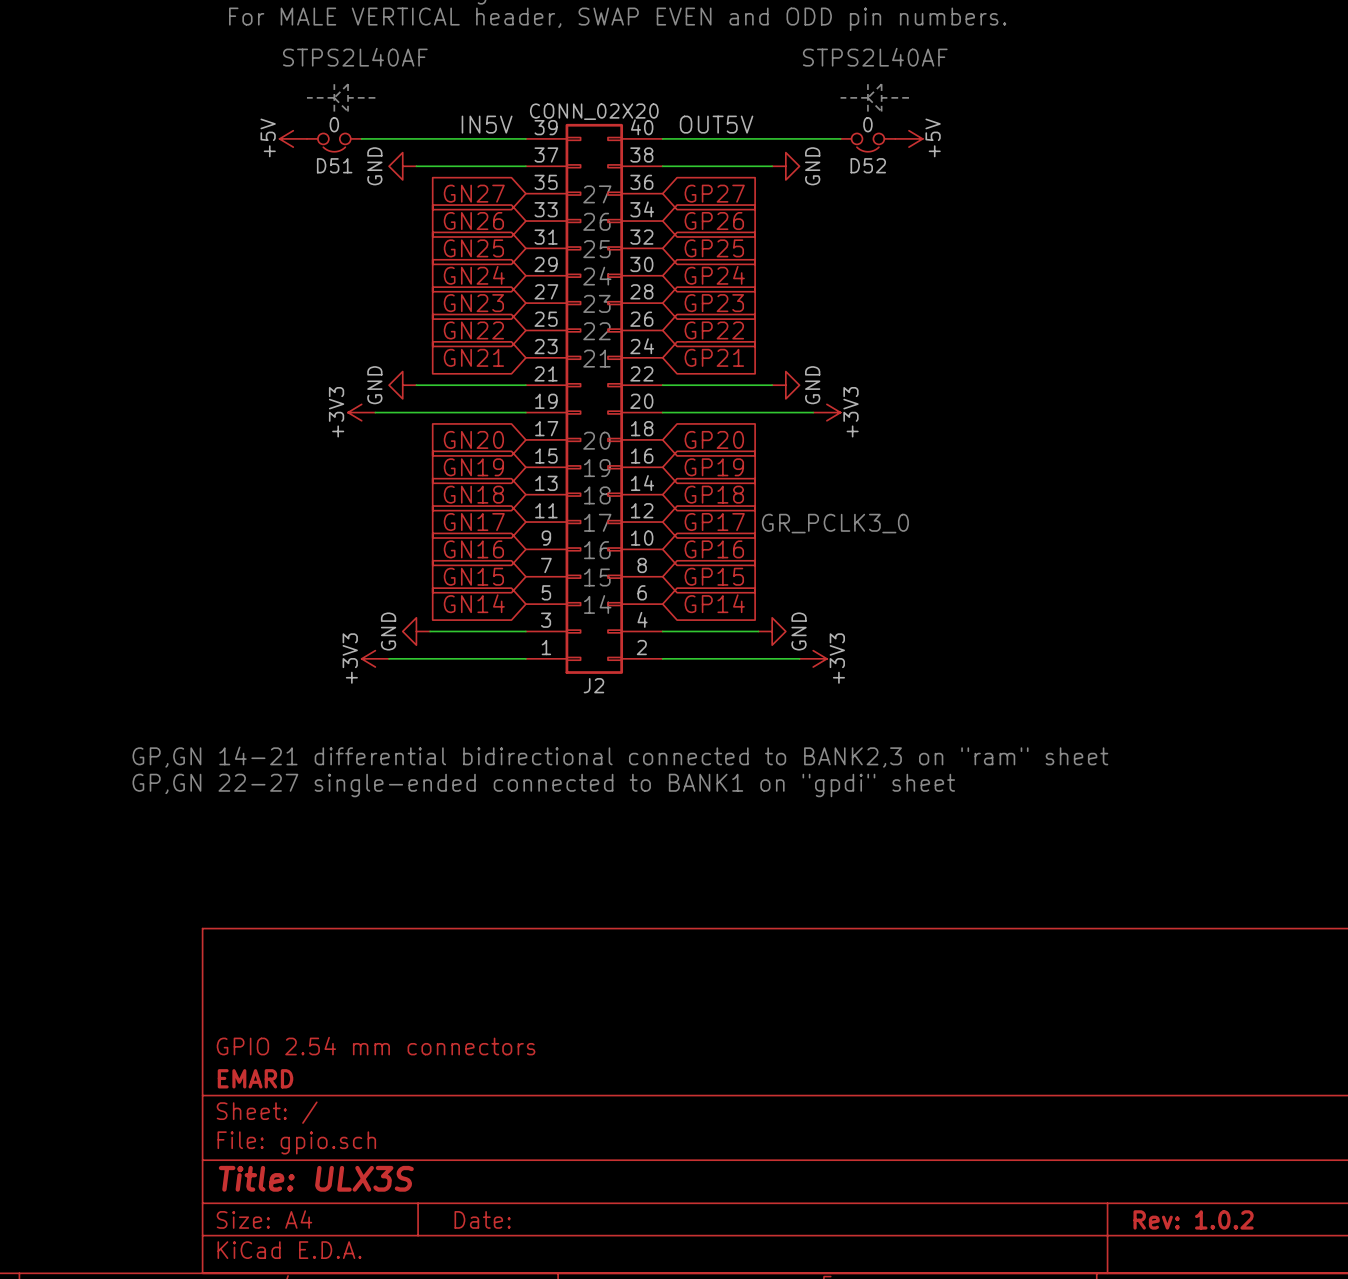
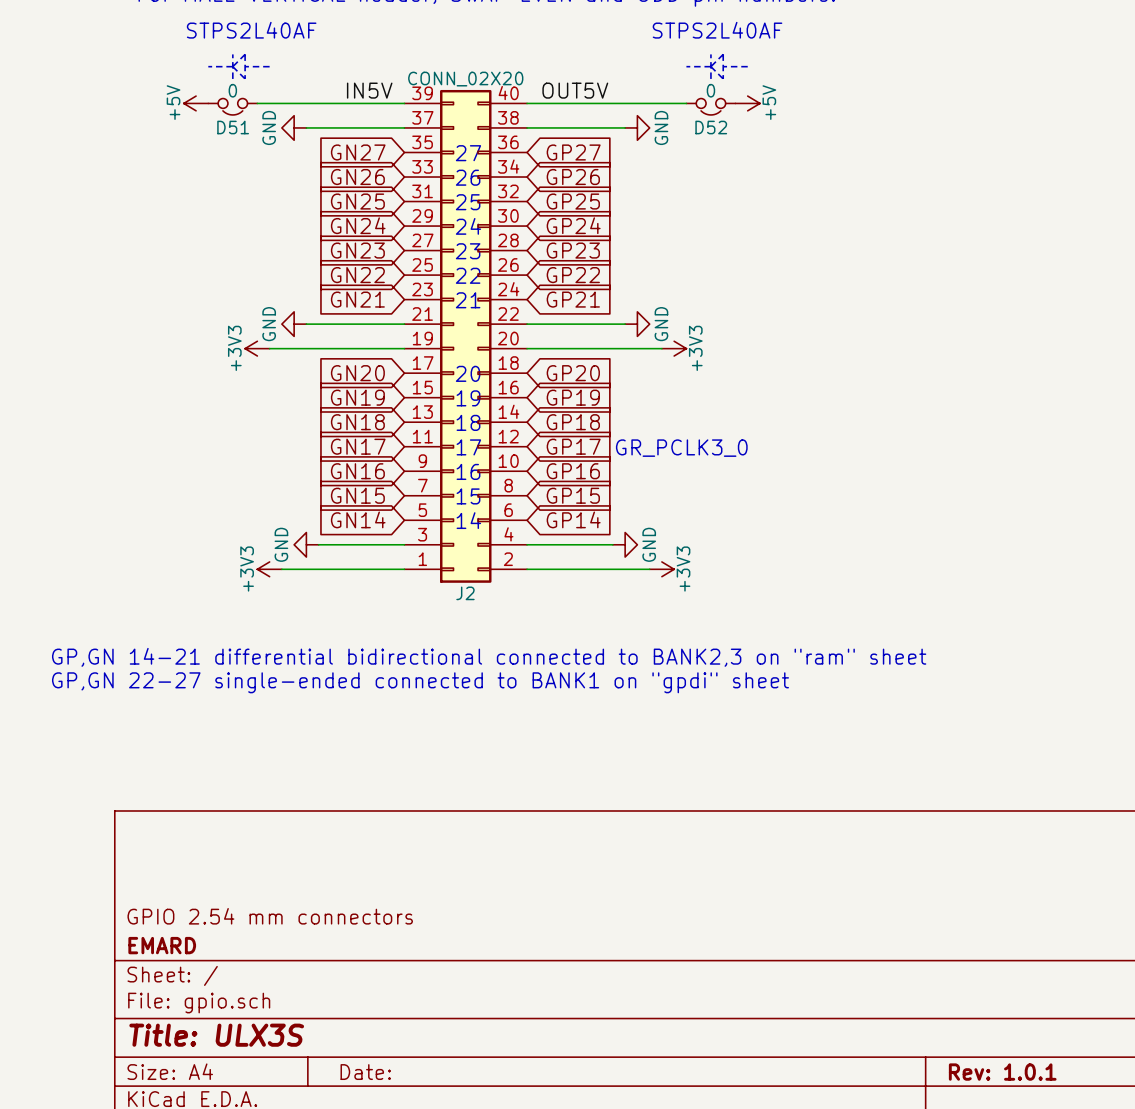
title block: Rev: 1.0.2 (1193, 1219) -> Rev: 1.0.1 (1002, 1072)

